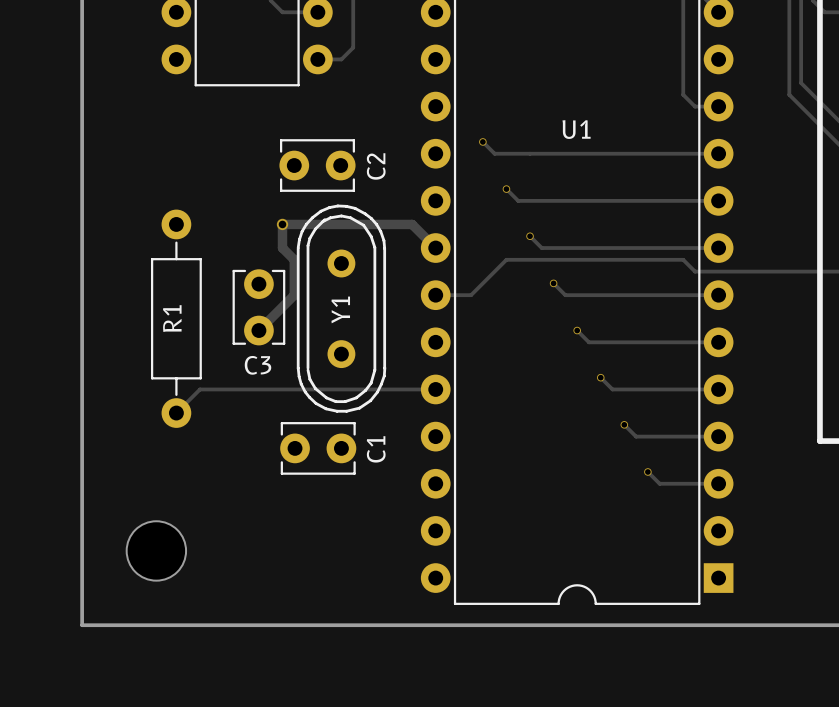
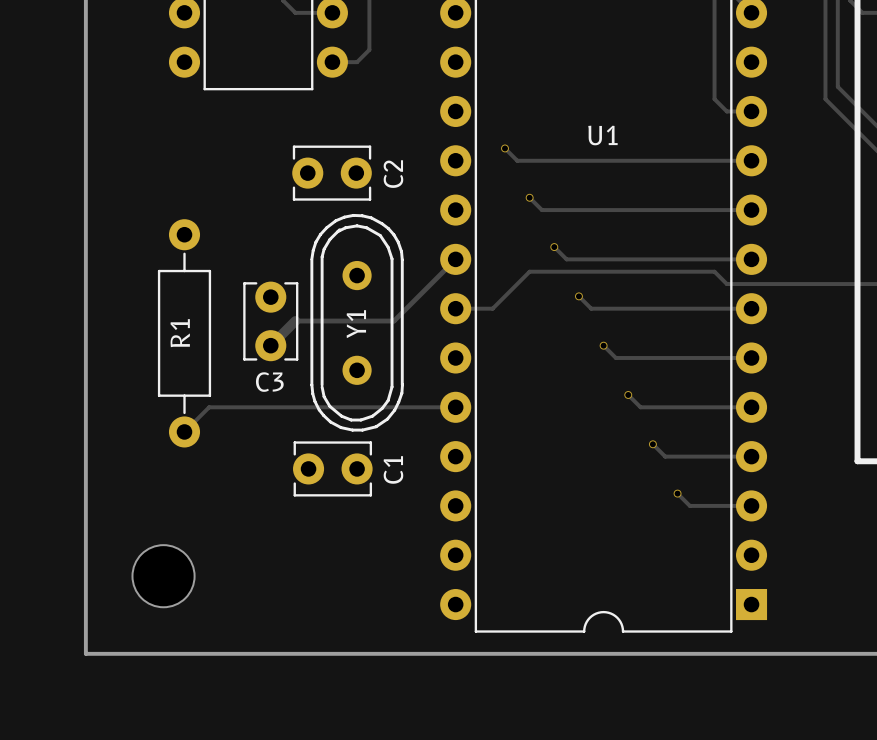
via: (282, 224) -> none
track: (435, 248) (412, 224) (282, 224) (282, 248) (294, 259) (294, 295) (282, 306) -> (455, 259) (394, 321) (295, 321)

